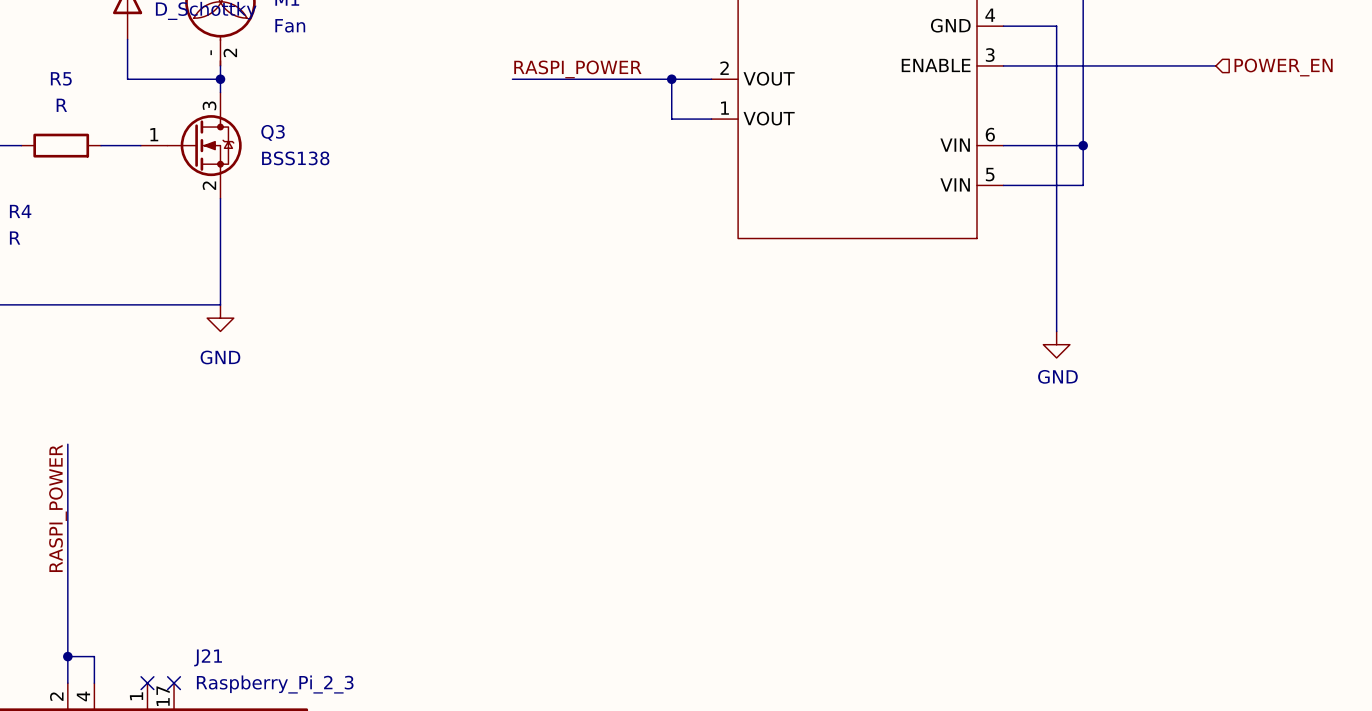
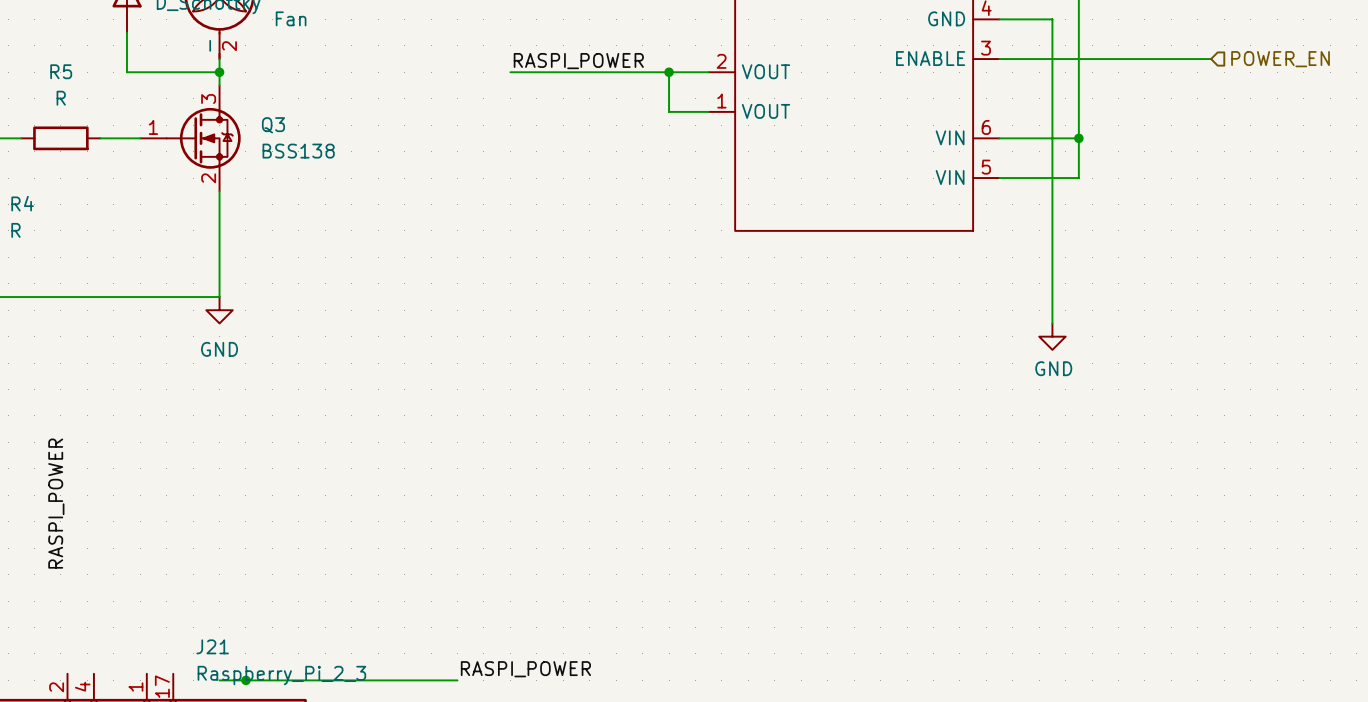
wire: (67, 444) (67, 683) -> none
wire: (67, 656) (94, 656) (94, 683) -> none
junction: (67, 656) -> none
label: none -> RASPI_POWER (525, 669)
no-connect mark: (147, 683) -> none
no-connect mark: (174, 683) -> none
wire: none -> (219, 680) (457, 680)
junction: none -> (245, 680)

